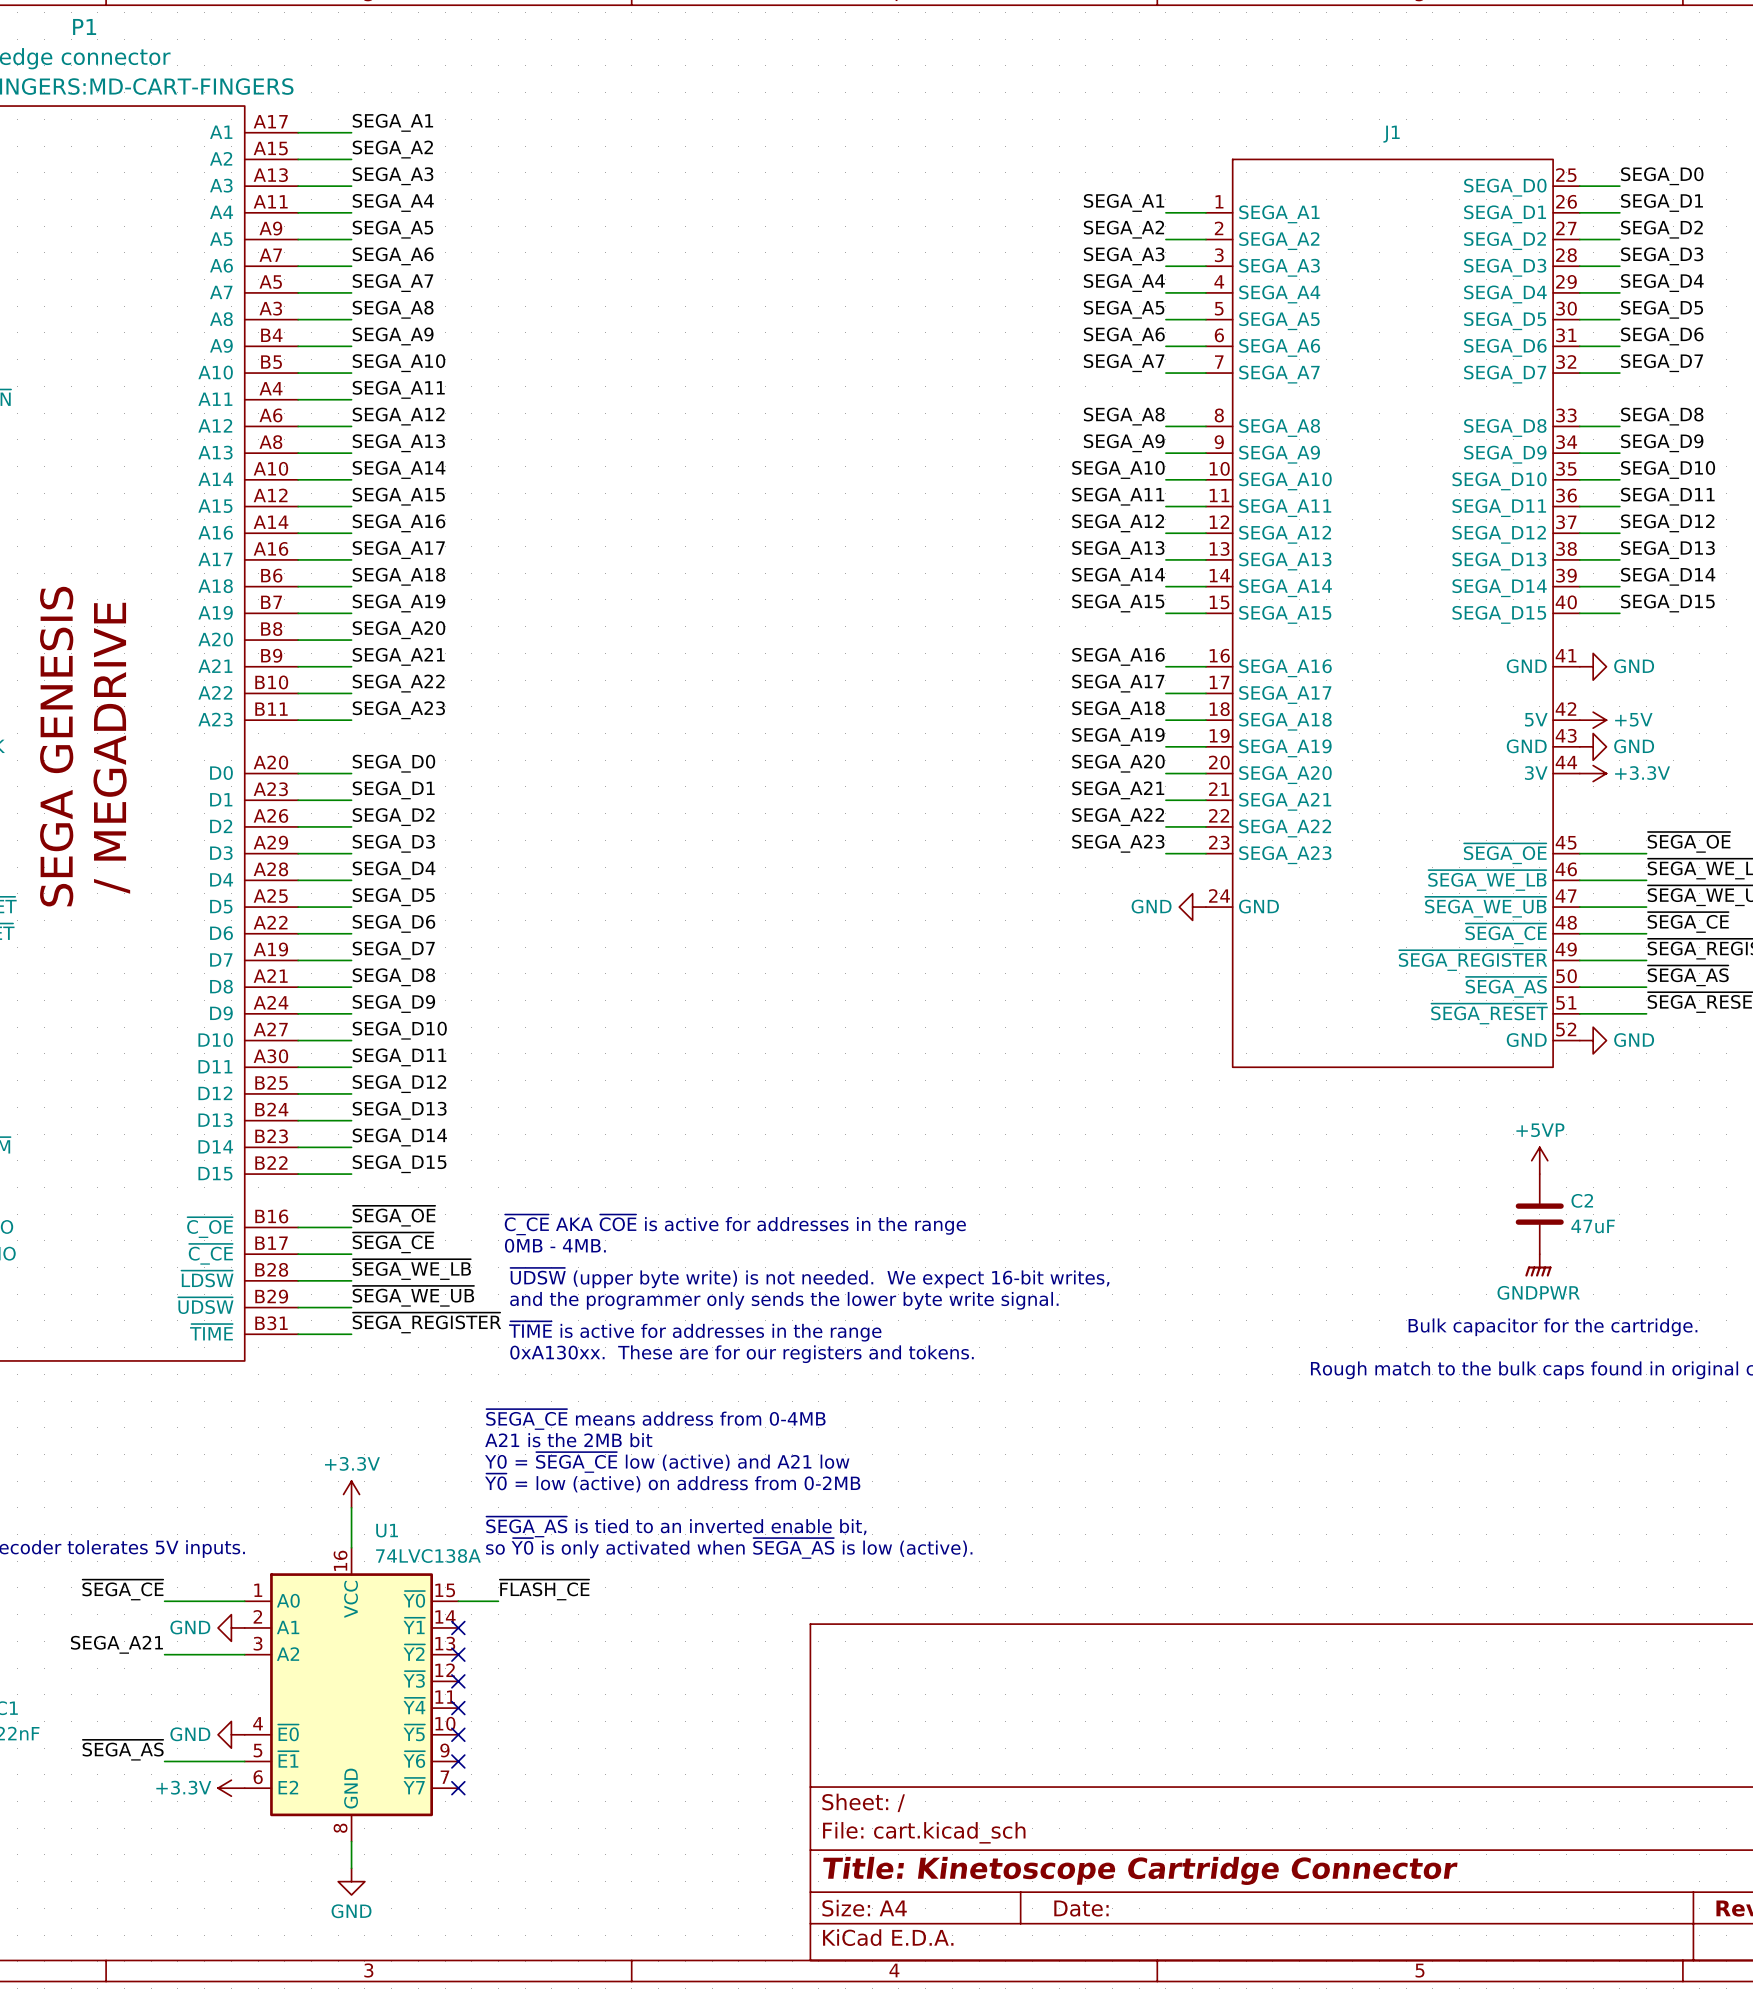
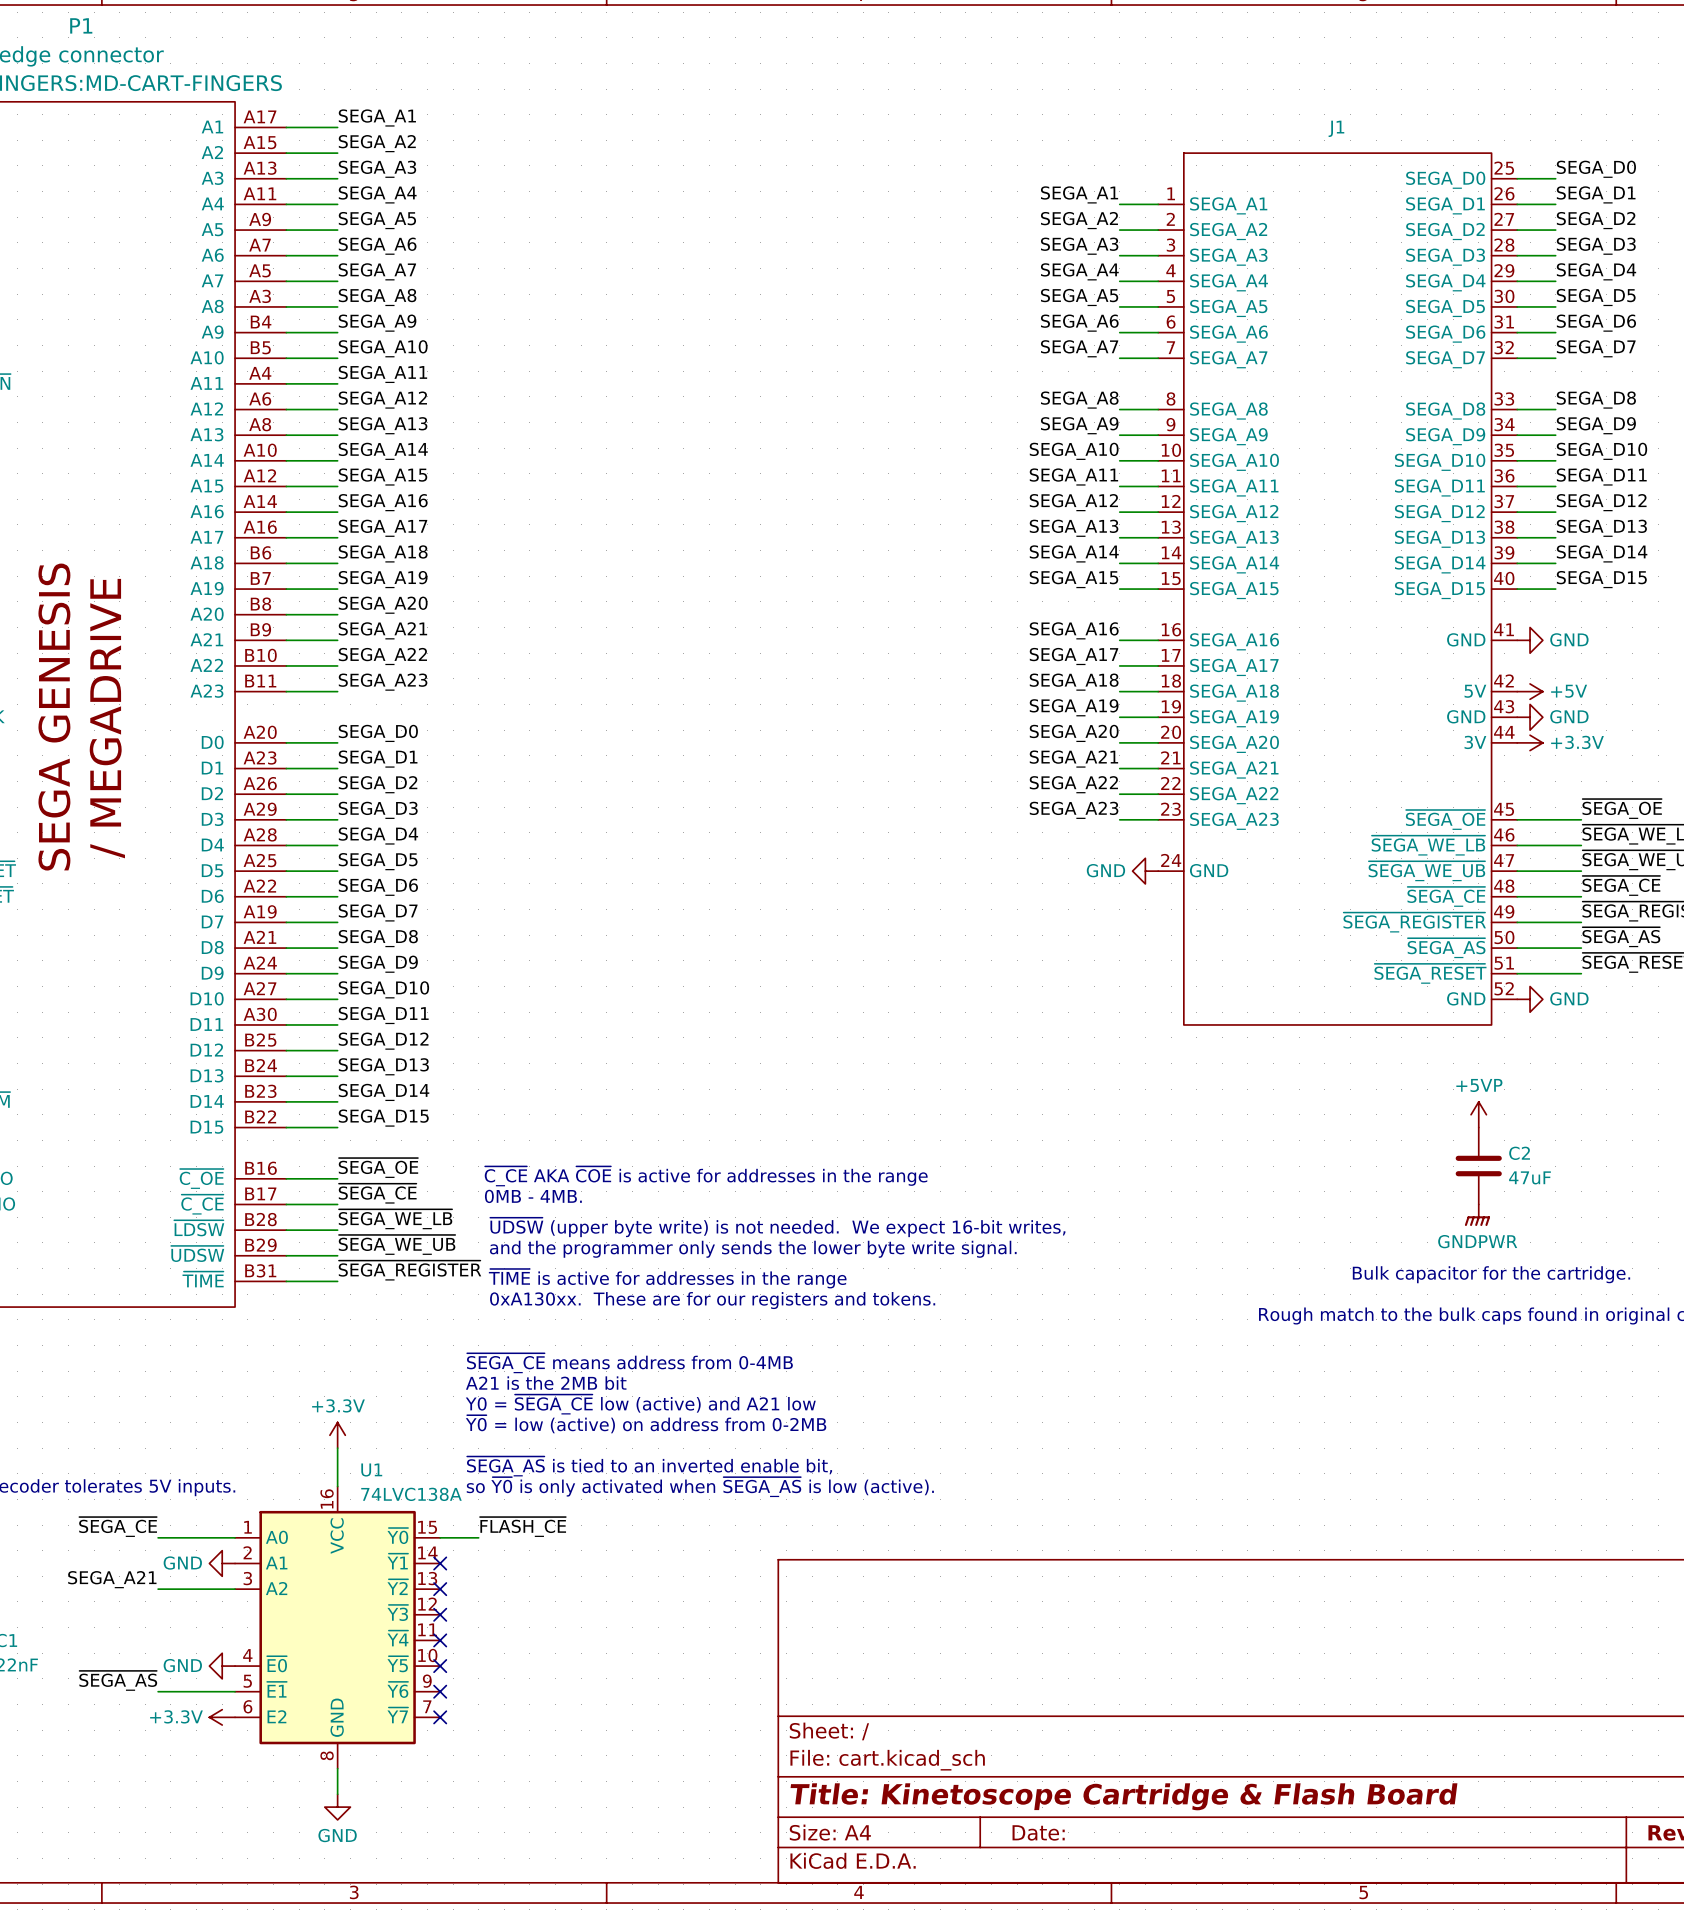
title block: Title: Kinetoscope Cartridge Connector (1140, 1870) -> Title: Kinetoscope Cartridge & Flash Board (1123, 1796)

